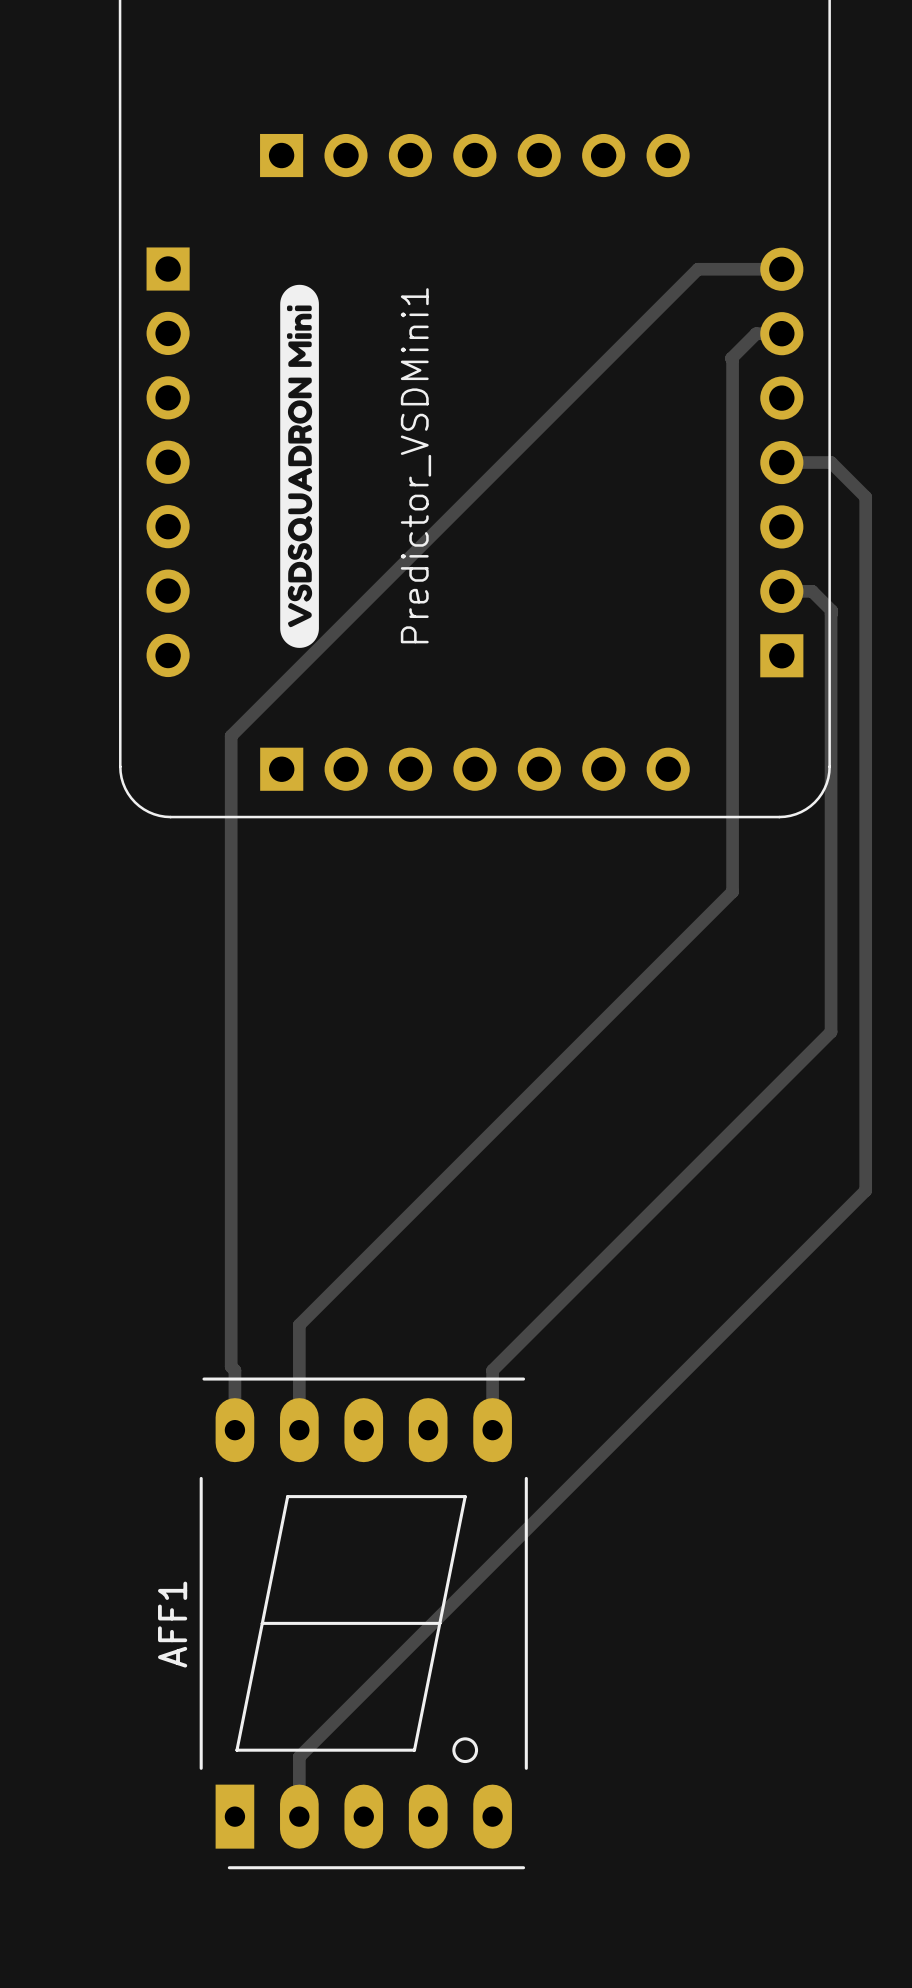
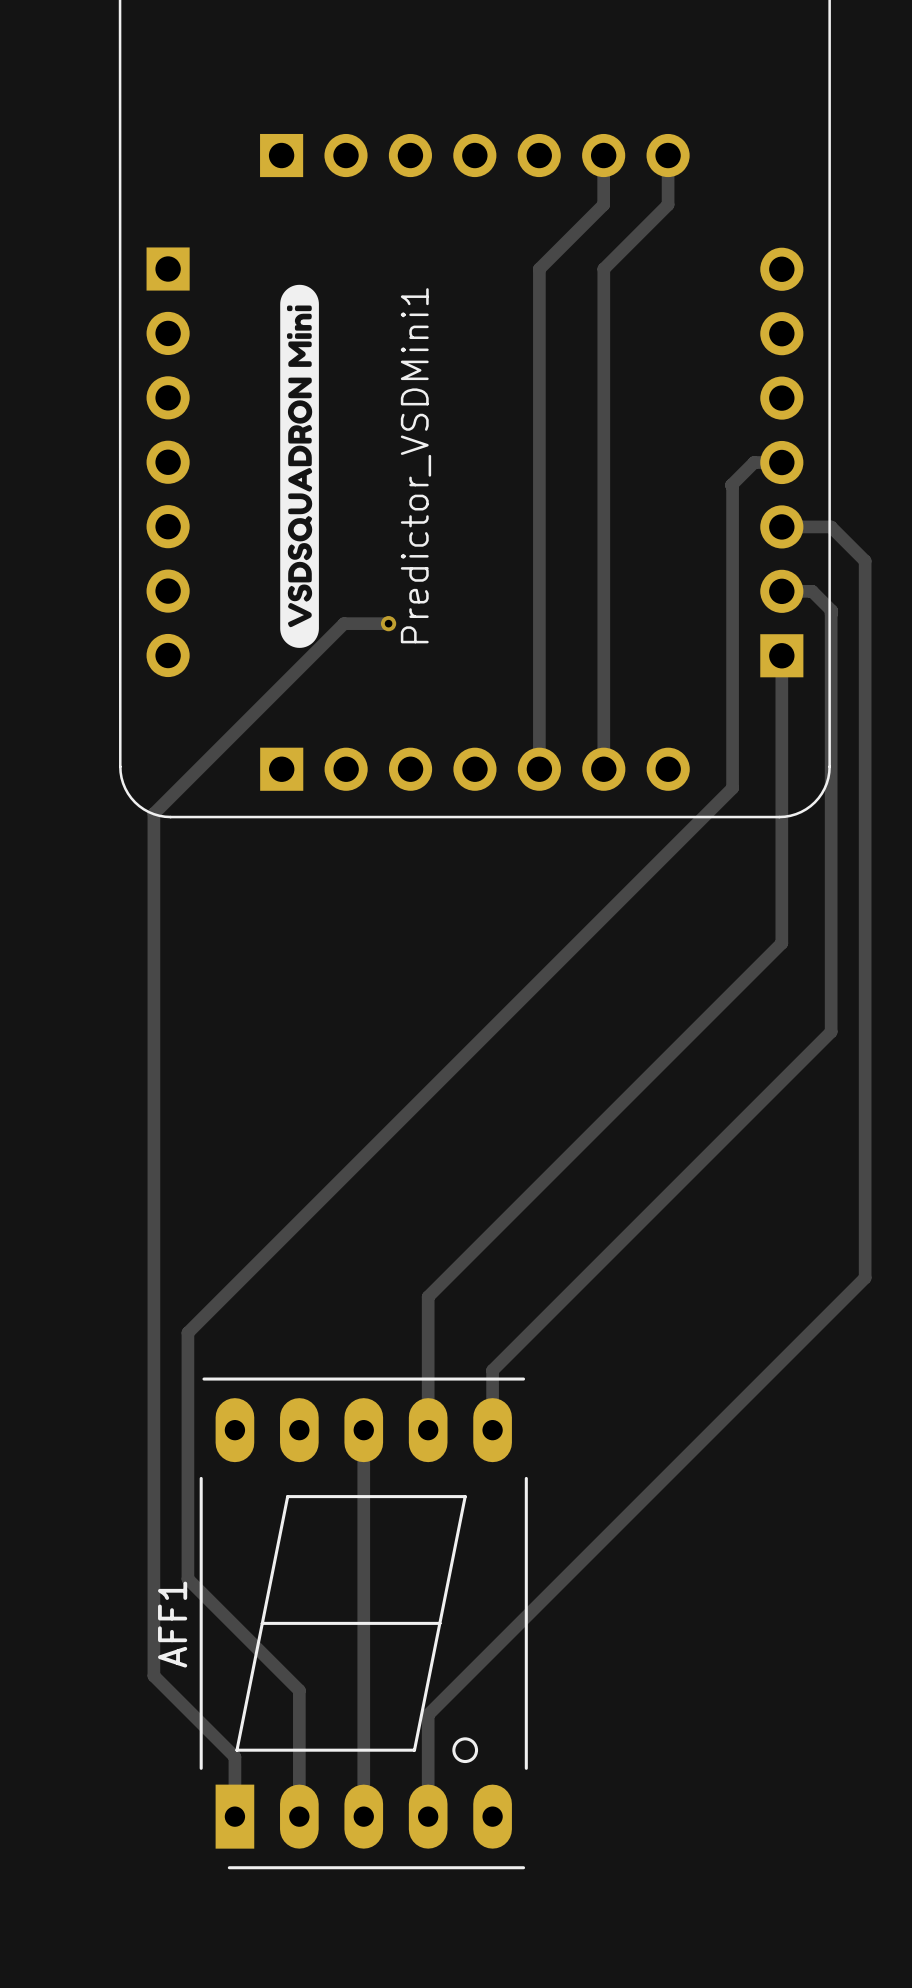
track: none -> (603, 155) (603, 204) (539, 269) (539, 769)
track: none -> (668, 155) (668, 204) (603, 269) (603, 769)
track: (781, 269) (697, 269) (231, 736) (231, 1366) (234, 1370) (234, 1430) -> none
track: (781, 333) (756, 333) (731, 358) (732, 486) -> (781, 462) (754, 462) (731, 485) (732, 486)
track: (781, 462) (831, 462) (865, 497) (865, 1190) (299, 1756) -> none
track: none -> (781, 526) (831, 526) (865, 561) (865, 1277) (428, 1714) (428, 1816)
track: none -> (388, 623) (344, 623) (153, 813) (153, 1675) (234, 1756) (234, 1816)
via: none -> (388, 623)
track: none -> (781, 655) (781, 943) (428, 1296) (428, 1430)
track: (732, 788) (732, 891) (299, 1324) (299, 1430) -> (732, 788) (187, 1332) (187, 1579) (299, 1690) (299, 1756)
track: none -> (363, 1430) (363, 1816)

